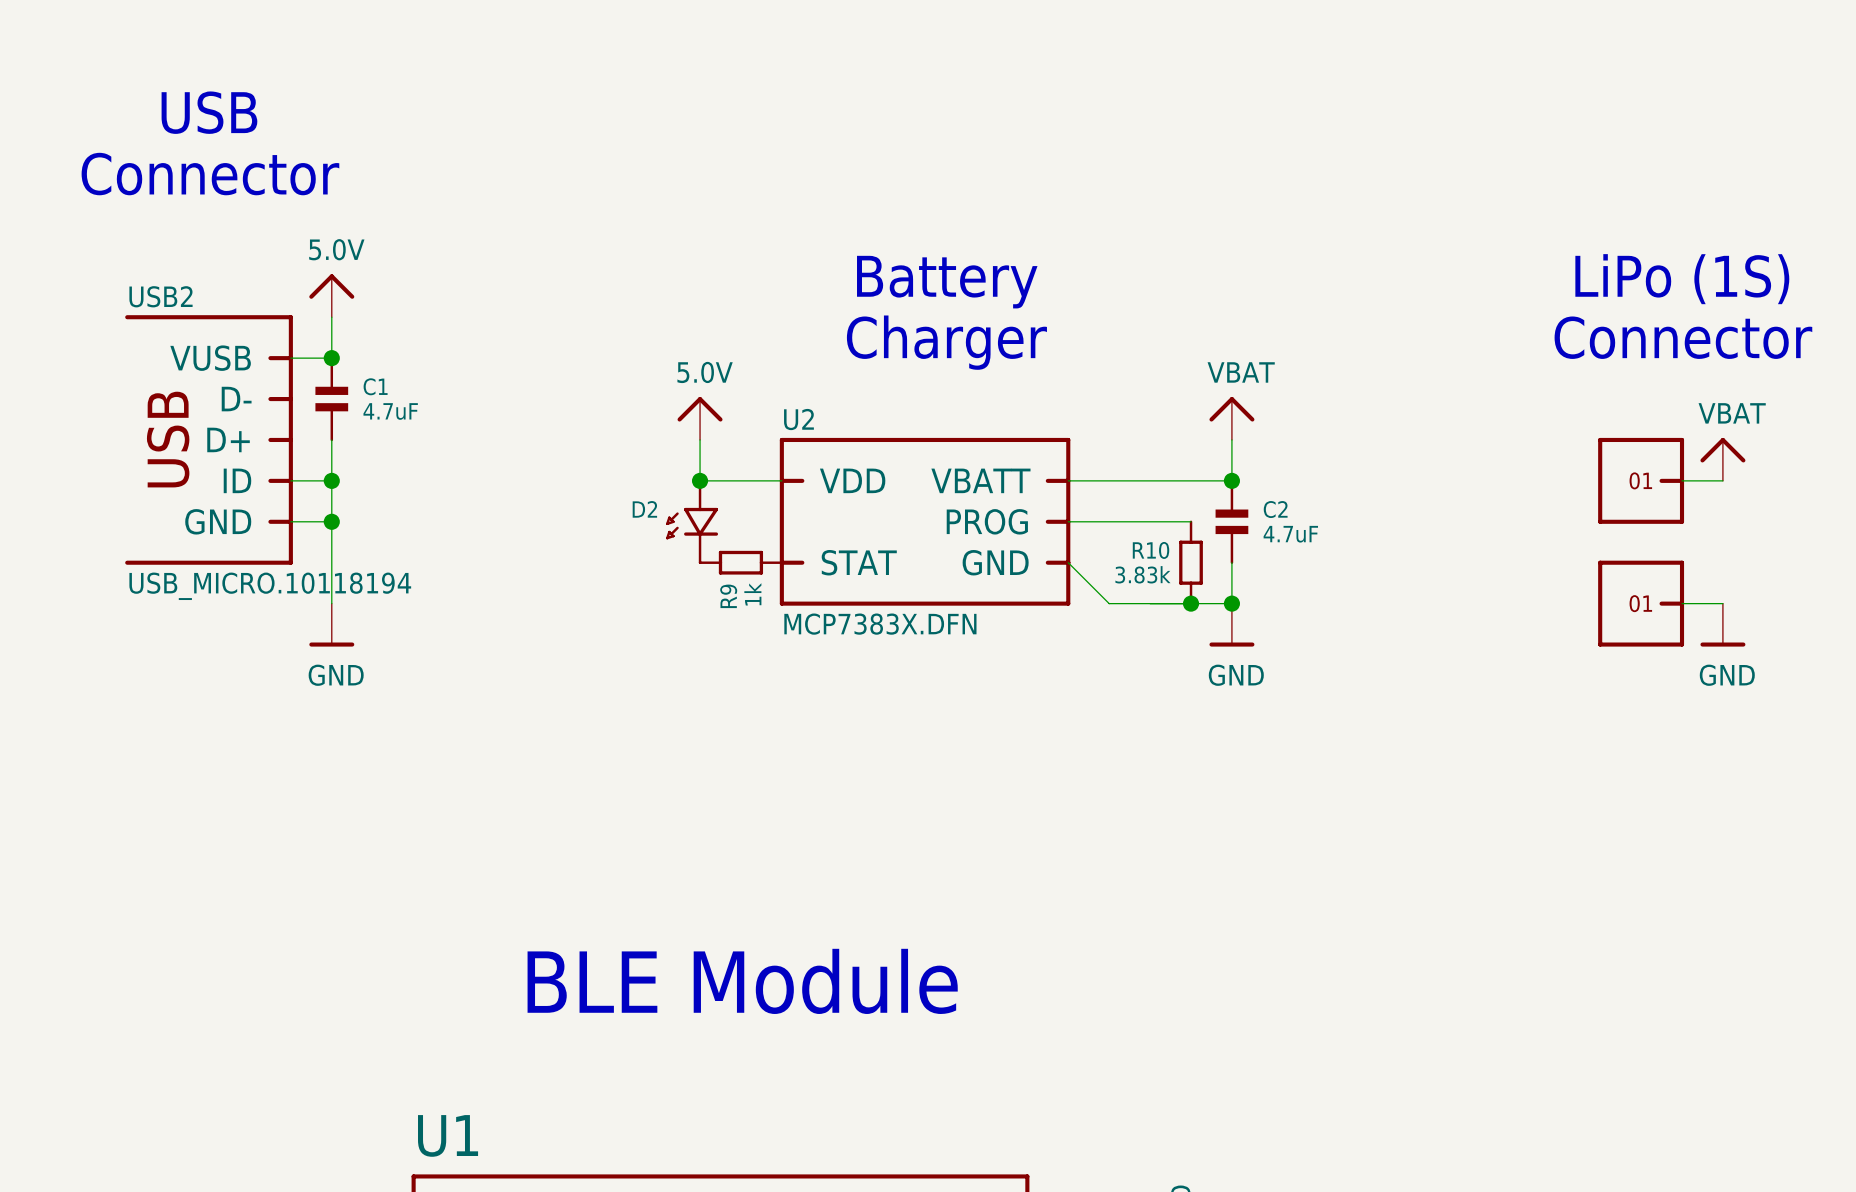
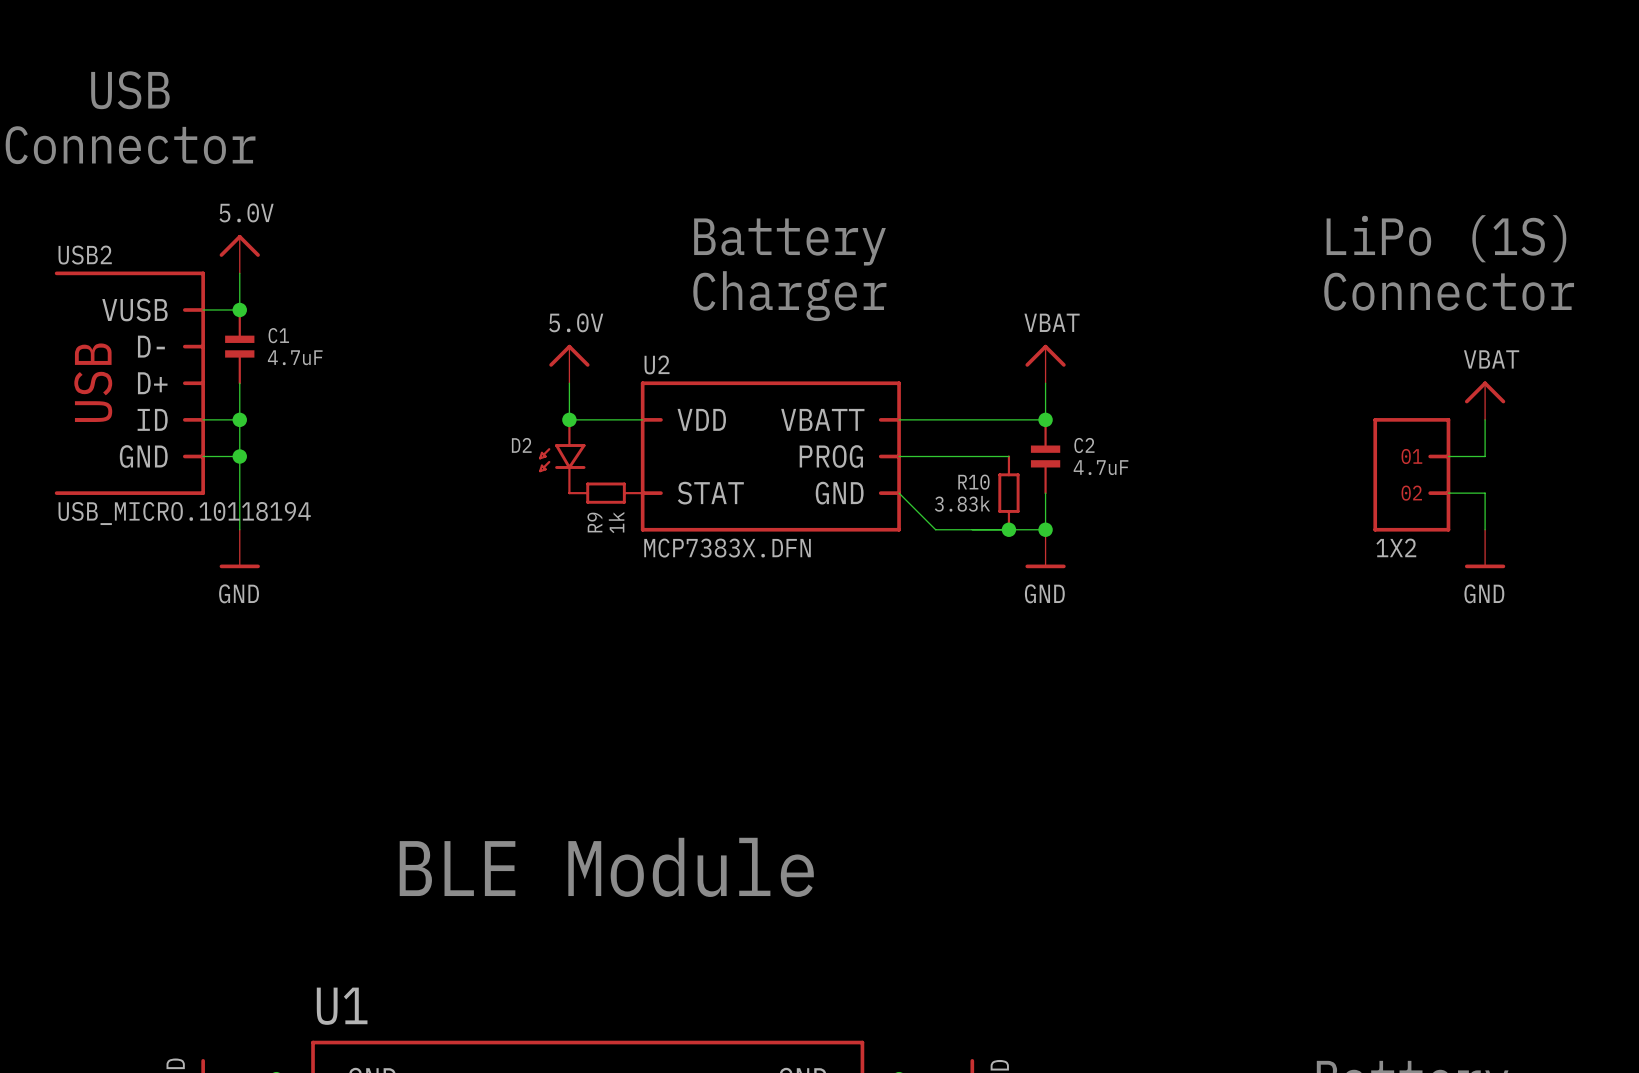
part: (1641, 480) -> none
wire: (1682, 480) (1722, 480) -> (1448, 456) (1485, 456) (1485, 419)
part: none -> 1X2 (1411, 474)
part: (1641, 603) -> none
wire: (1682, 603) (1722, 603) -> (1448, 493) (1485, 493) (1485, 529)

